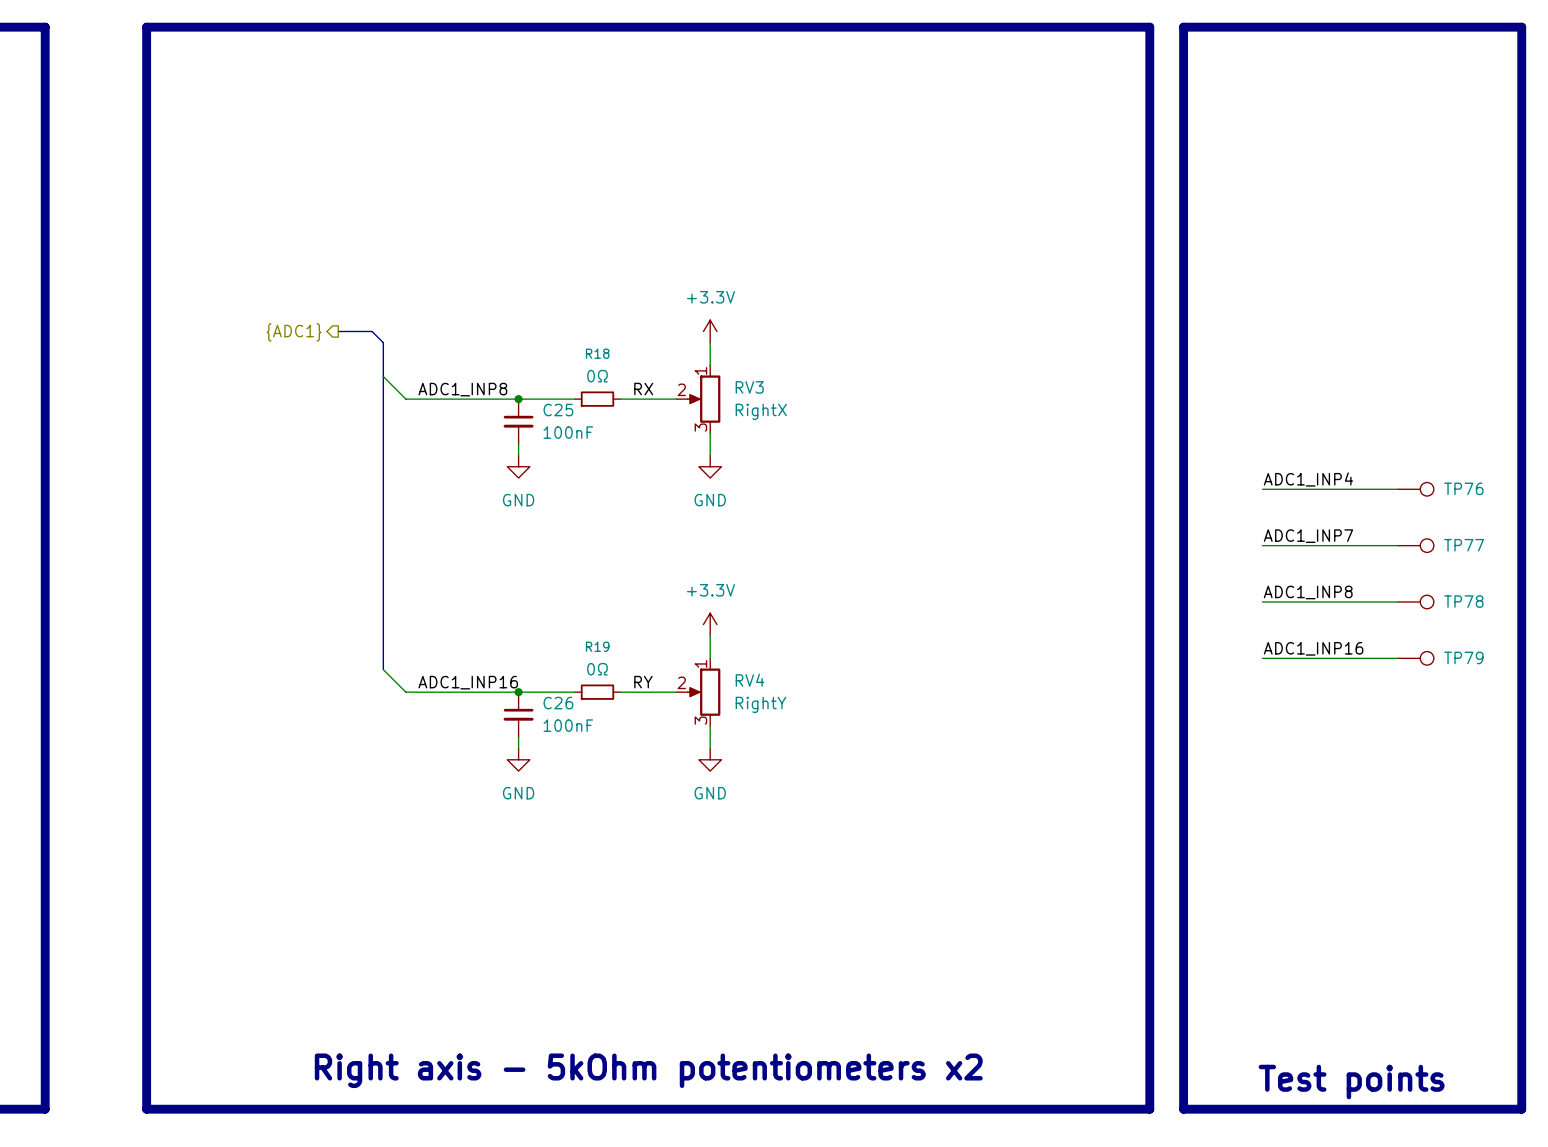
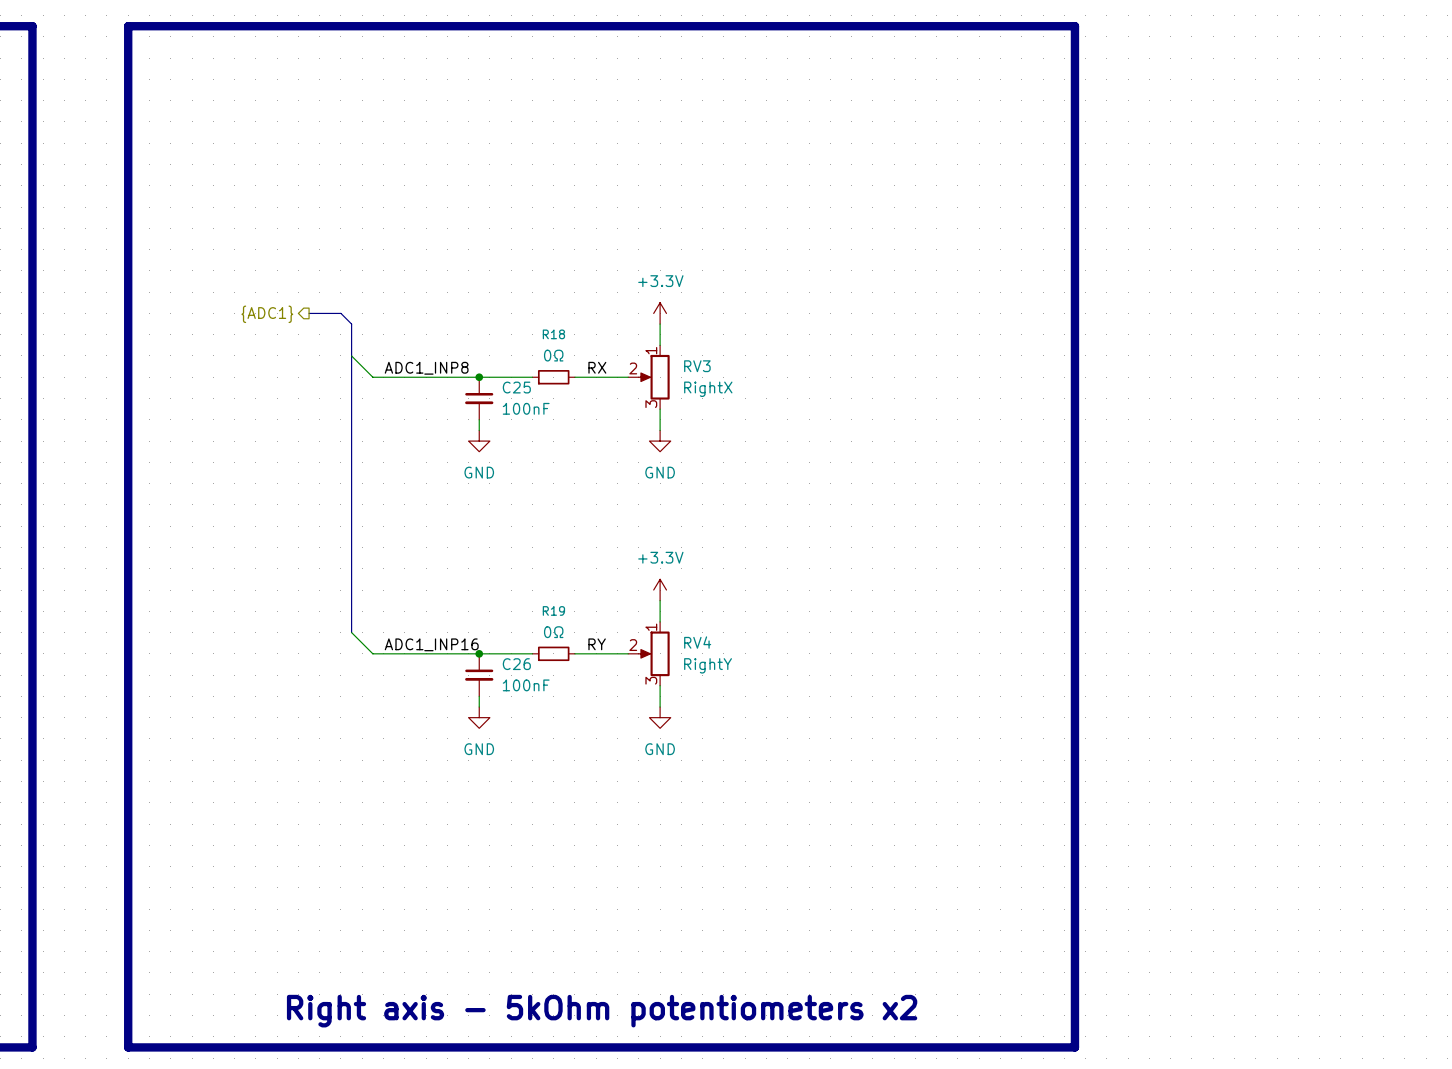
line: (1183, 27) (1521, 27) (1521, 1109) (1183, 1109) (1183, 27) -> none
label: ADC1_INP4 (1308, 479) -> none
wire: (1262, 489) (1397, 489) -> none
TP76: (1415, 489) -> none
label: ADC1_INP7 (1308, 536) -> none
wire: (1262, 545) (1397, 545) -> none
TP77: (1415, 545) -> none
label: ADC1_INP8 (1308, 592) -> none
wire: (1262, 602) (1397, 602) -> none
TP78: (1415, 602) -> none
label: ADC1_INP16 (1313, 648) -> none
wire: (1262, 658) (1397, 658) -> none
TP79: (1415, 658) -> none
text: Test points (1351, 1082) -> none

